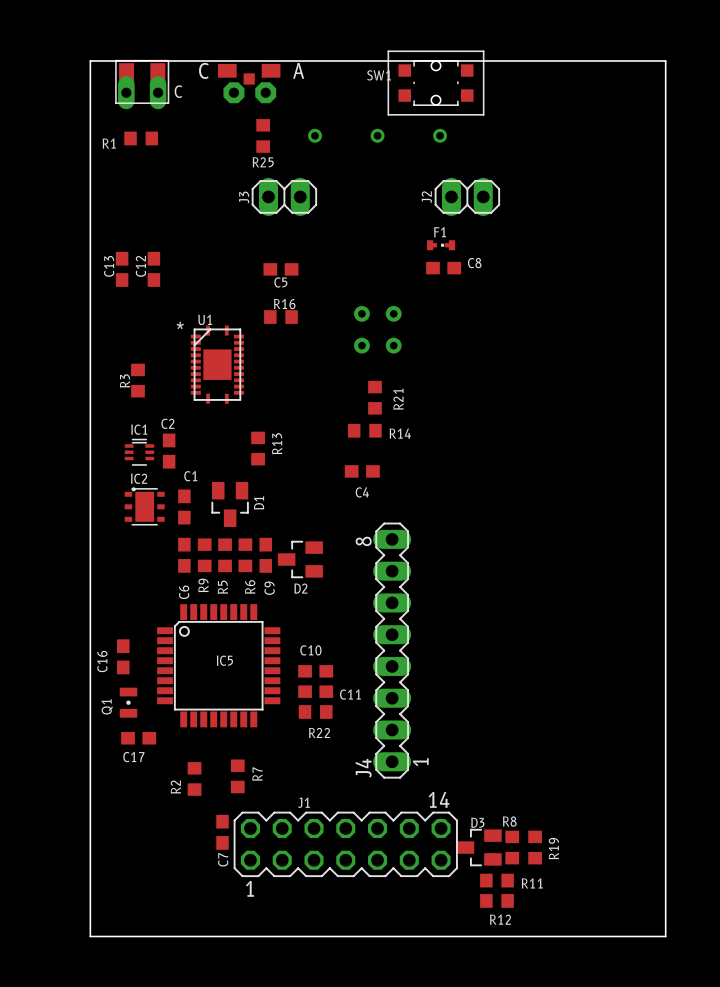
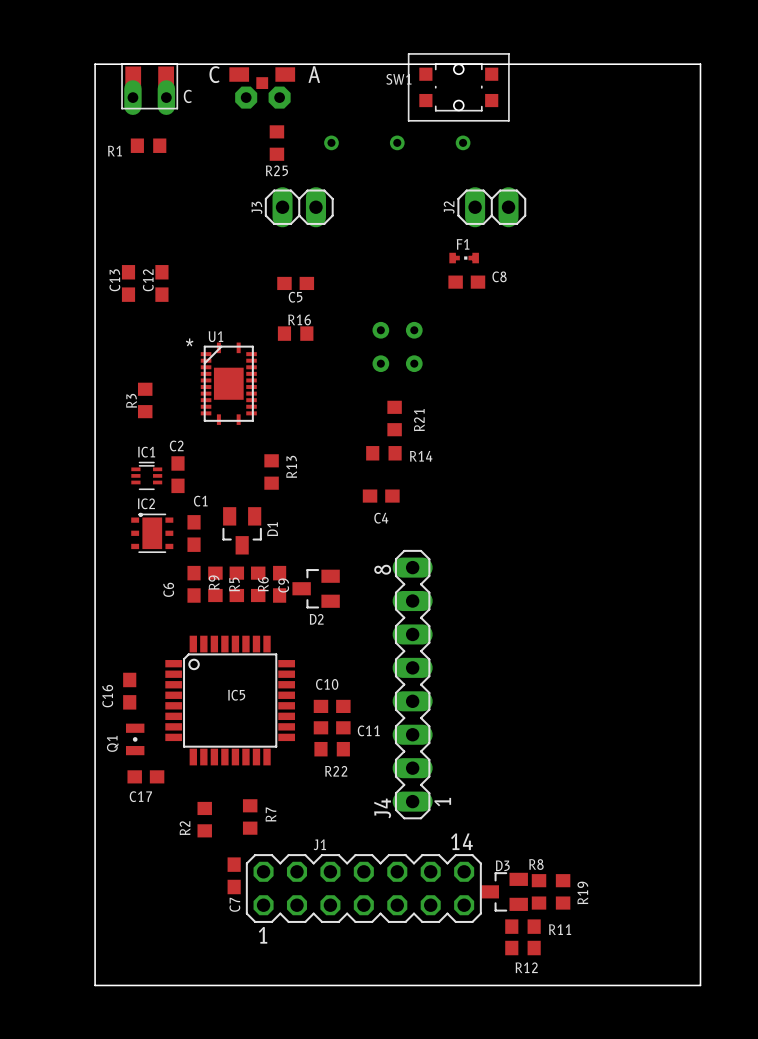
R9 name position: R9 (203, 585) -> R9 (214, 582)
R6 name position: R6 (250, 586) -> R6 (263, 584)
R5 name position: R5 (222, 587) -> R5 (234, 584)
C9 name position: C9 (269, 588) -> C9 (283, 585)
C6 name position: C6 (184, 592) -> C6 (168, 589)

